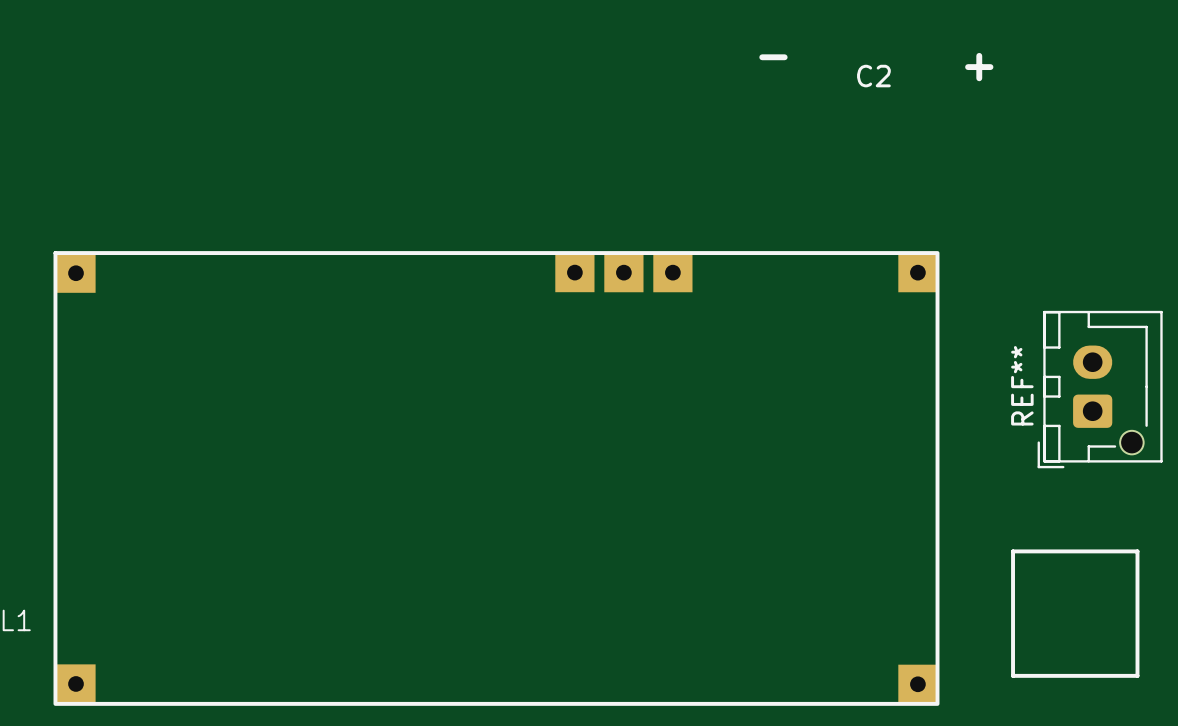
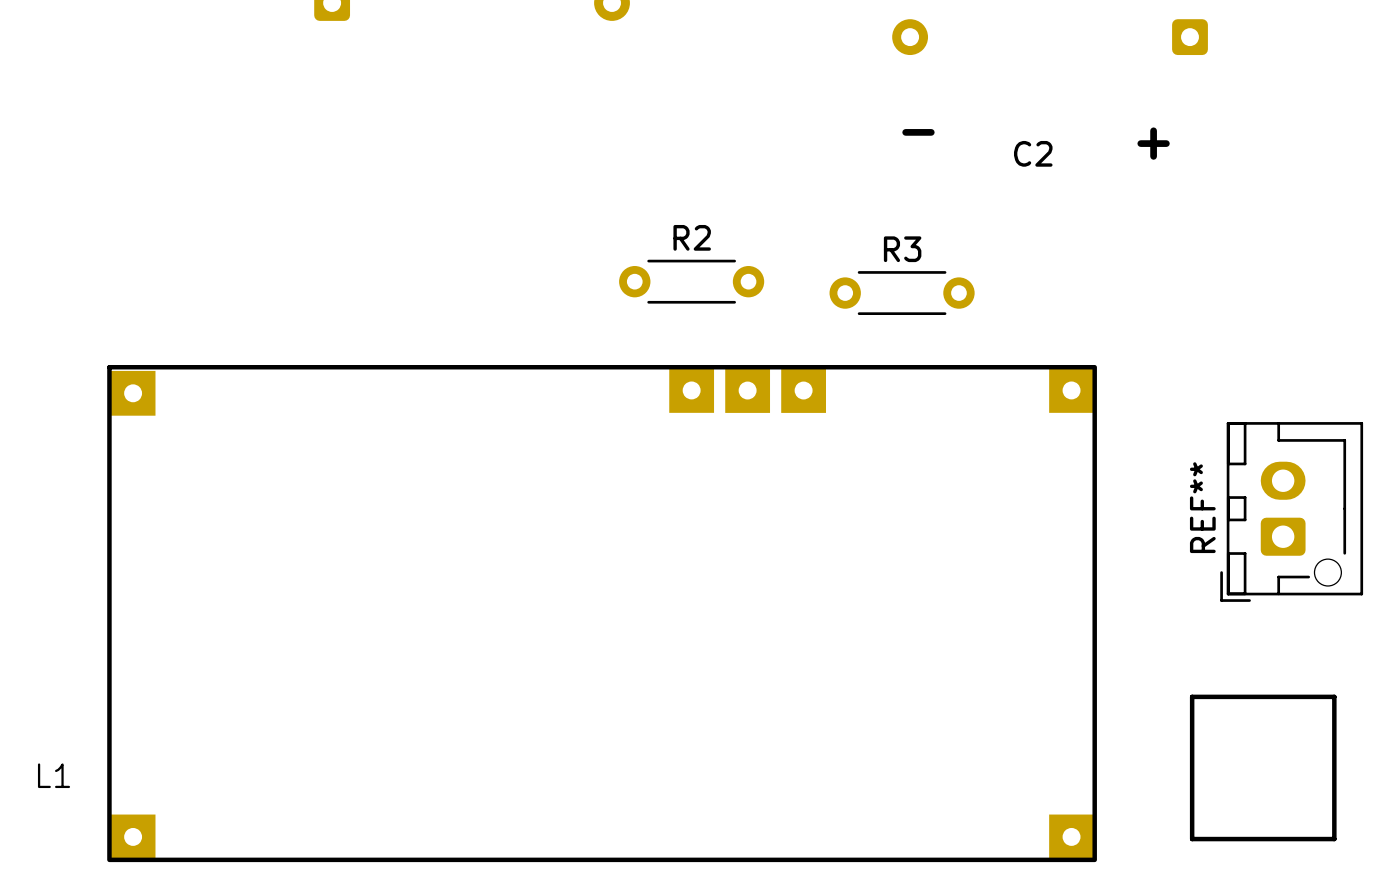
R2: none -> (691, 281)
R3: none -> (902, 293)
L1 footprint: [53, 251, 940, 706] -> [107, 364, 1097, 863]

